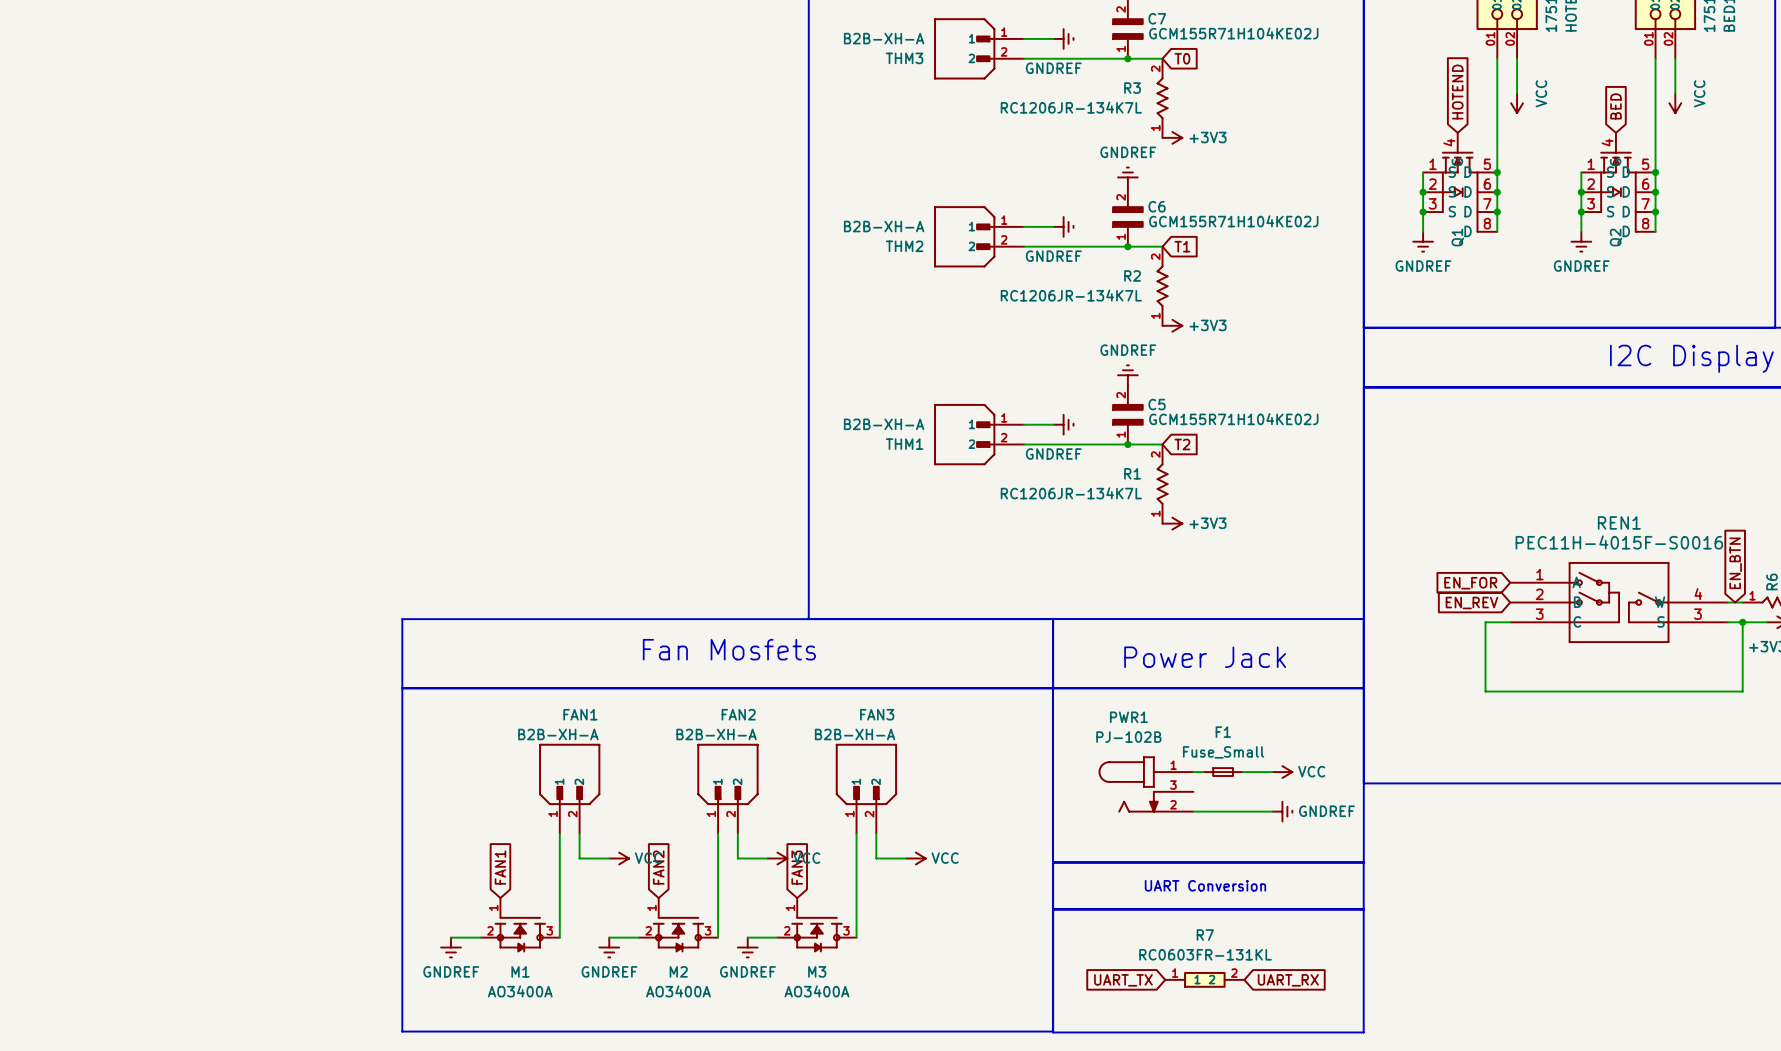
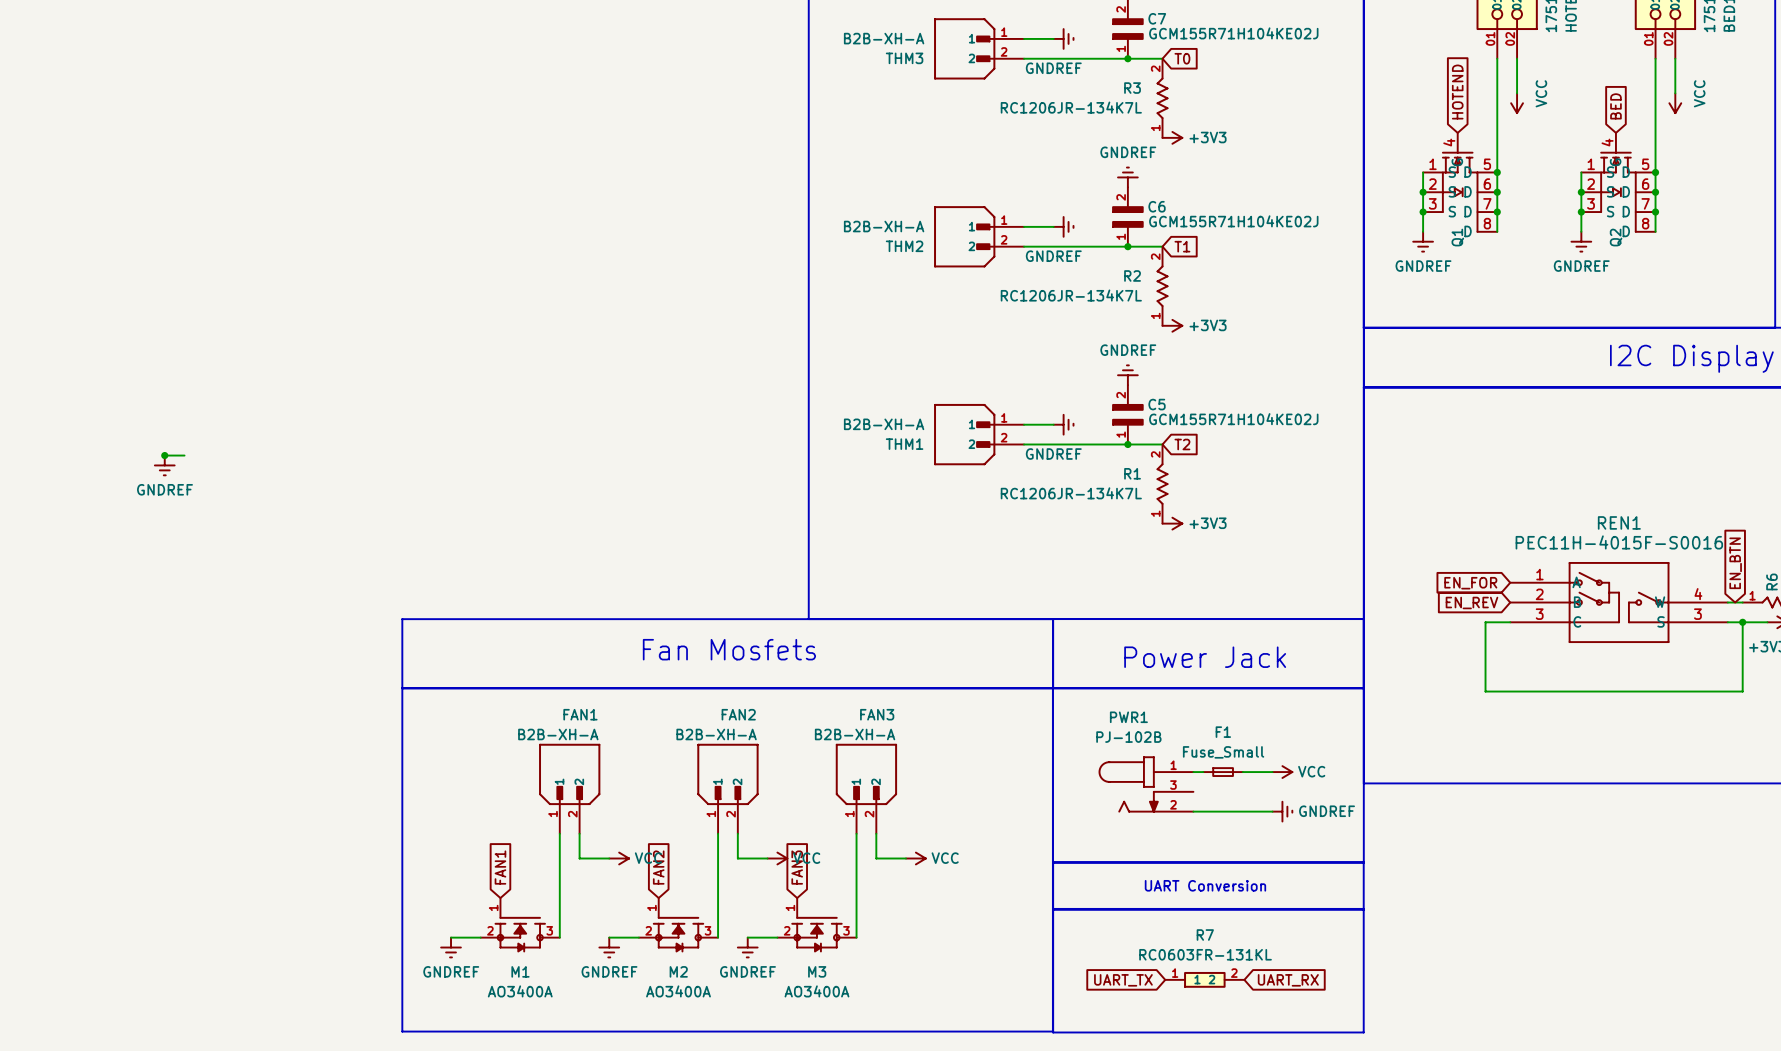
wire: none -> (164, 455) (184, 455)
junction: none -> (164, 455)
power symbol: none -> GNDREF (164, 465)

